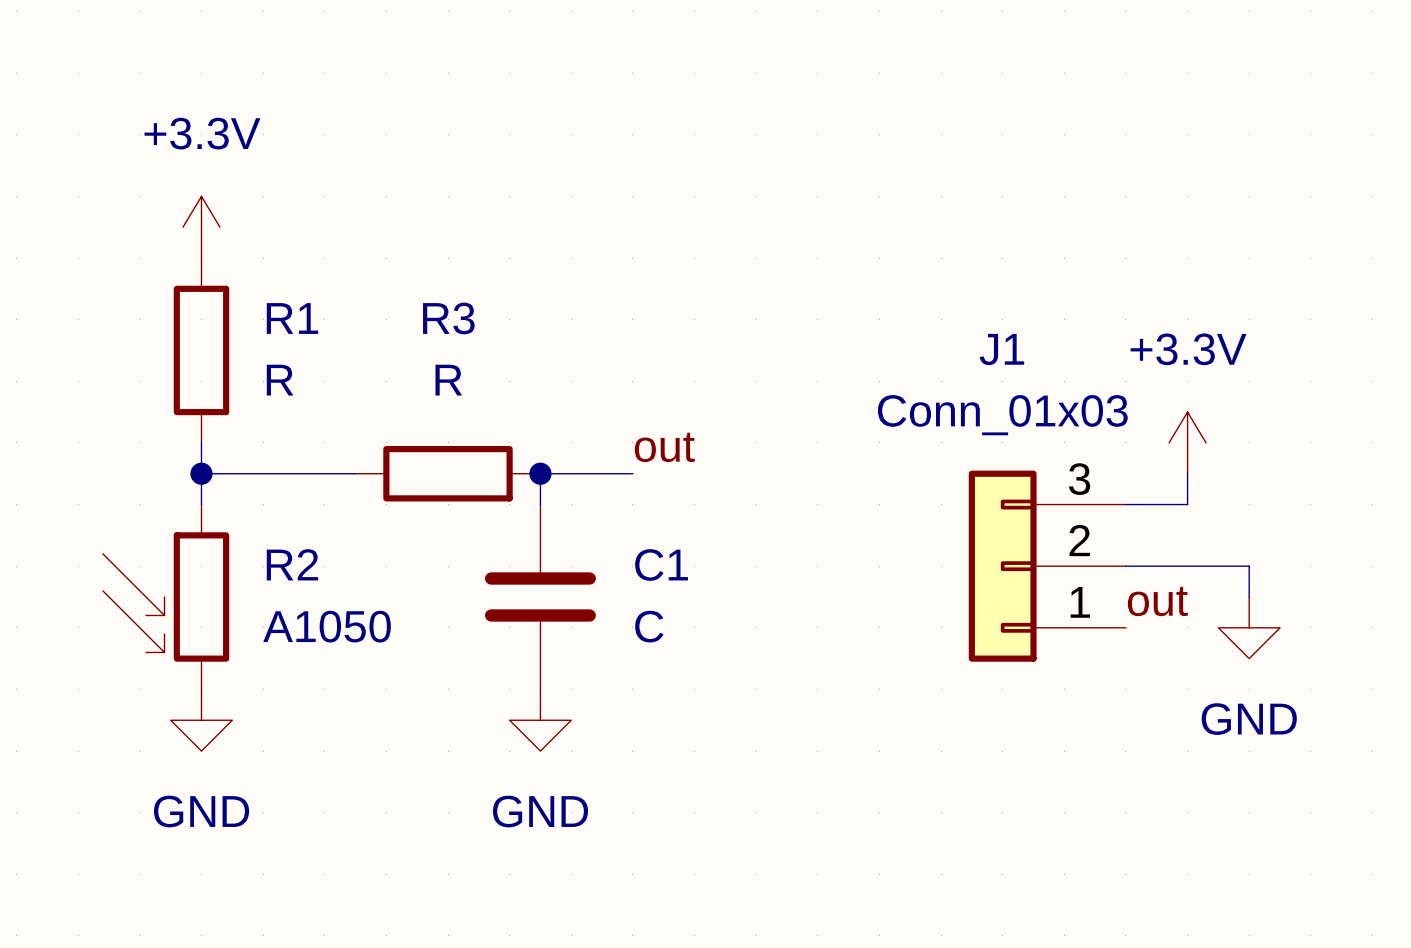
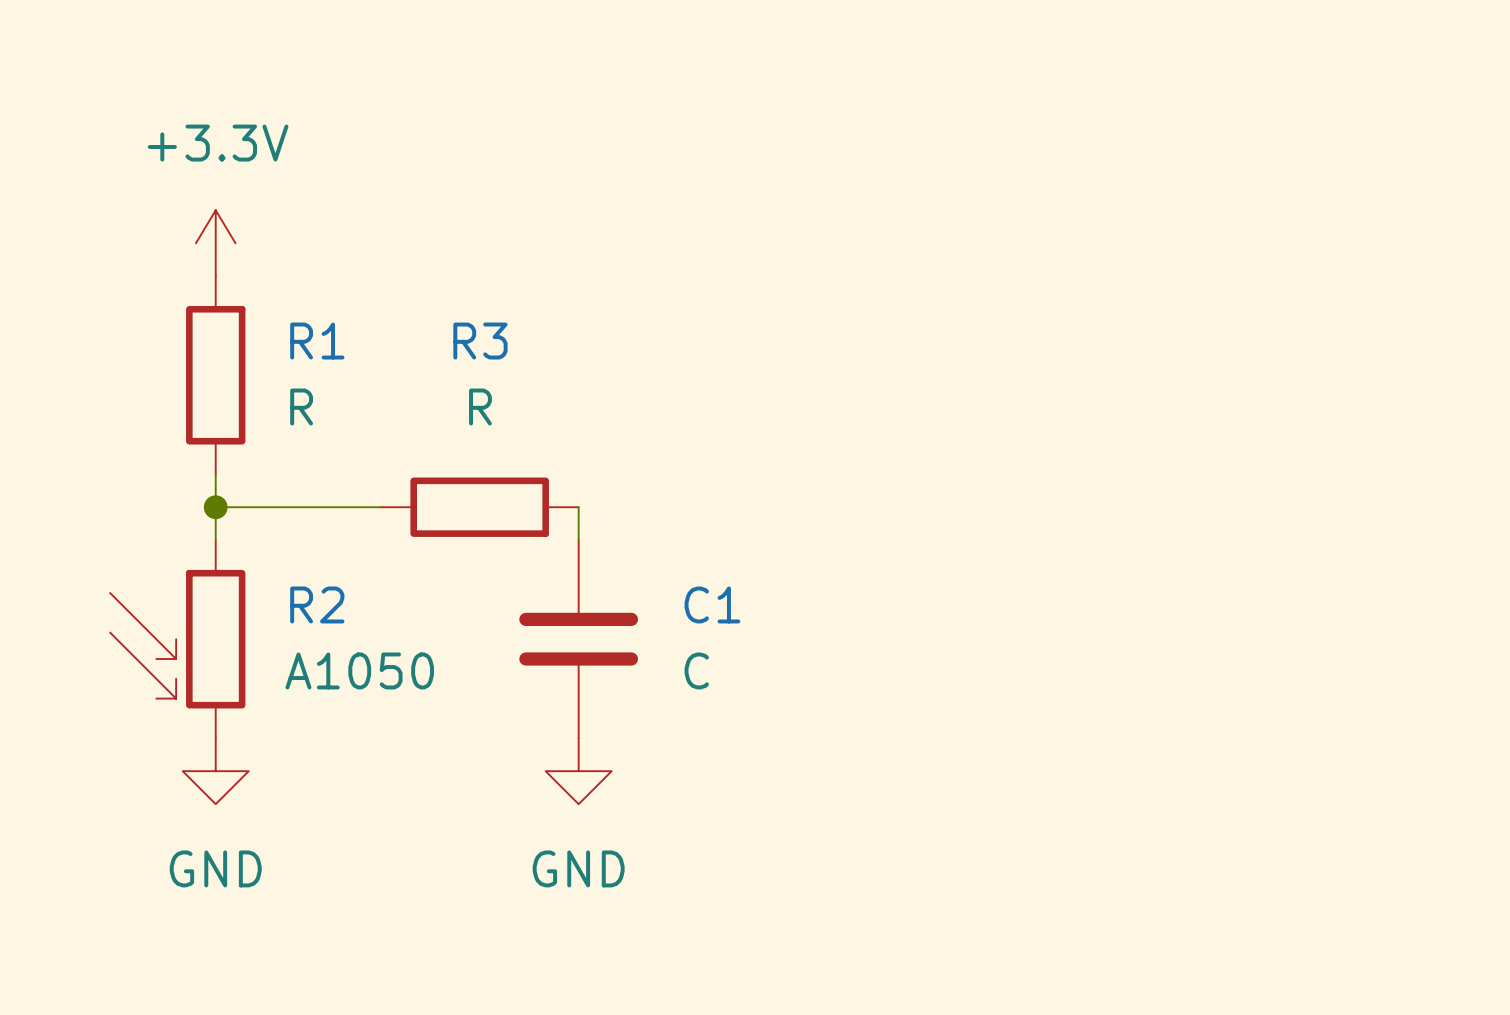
power symbol: +3.3V (1187, 442) -> none
label: out (664, 447) -> none
wire: (540, 473) (632, 473) -> none
junction: (540, 473) -> none
wire: (1187, 473) (1187, 504) (1125, 504) -> none
J1: Conn_01x03 (1047, 566) -> none
wire: (1125, 566) (1249, 566) (1249, 596) -> none
label: out (1157, 601) -> none
power symbol: GND (1249, 627) -> none

